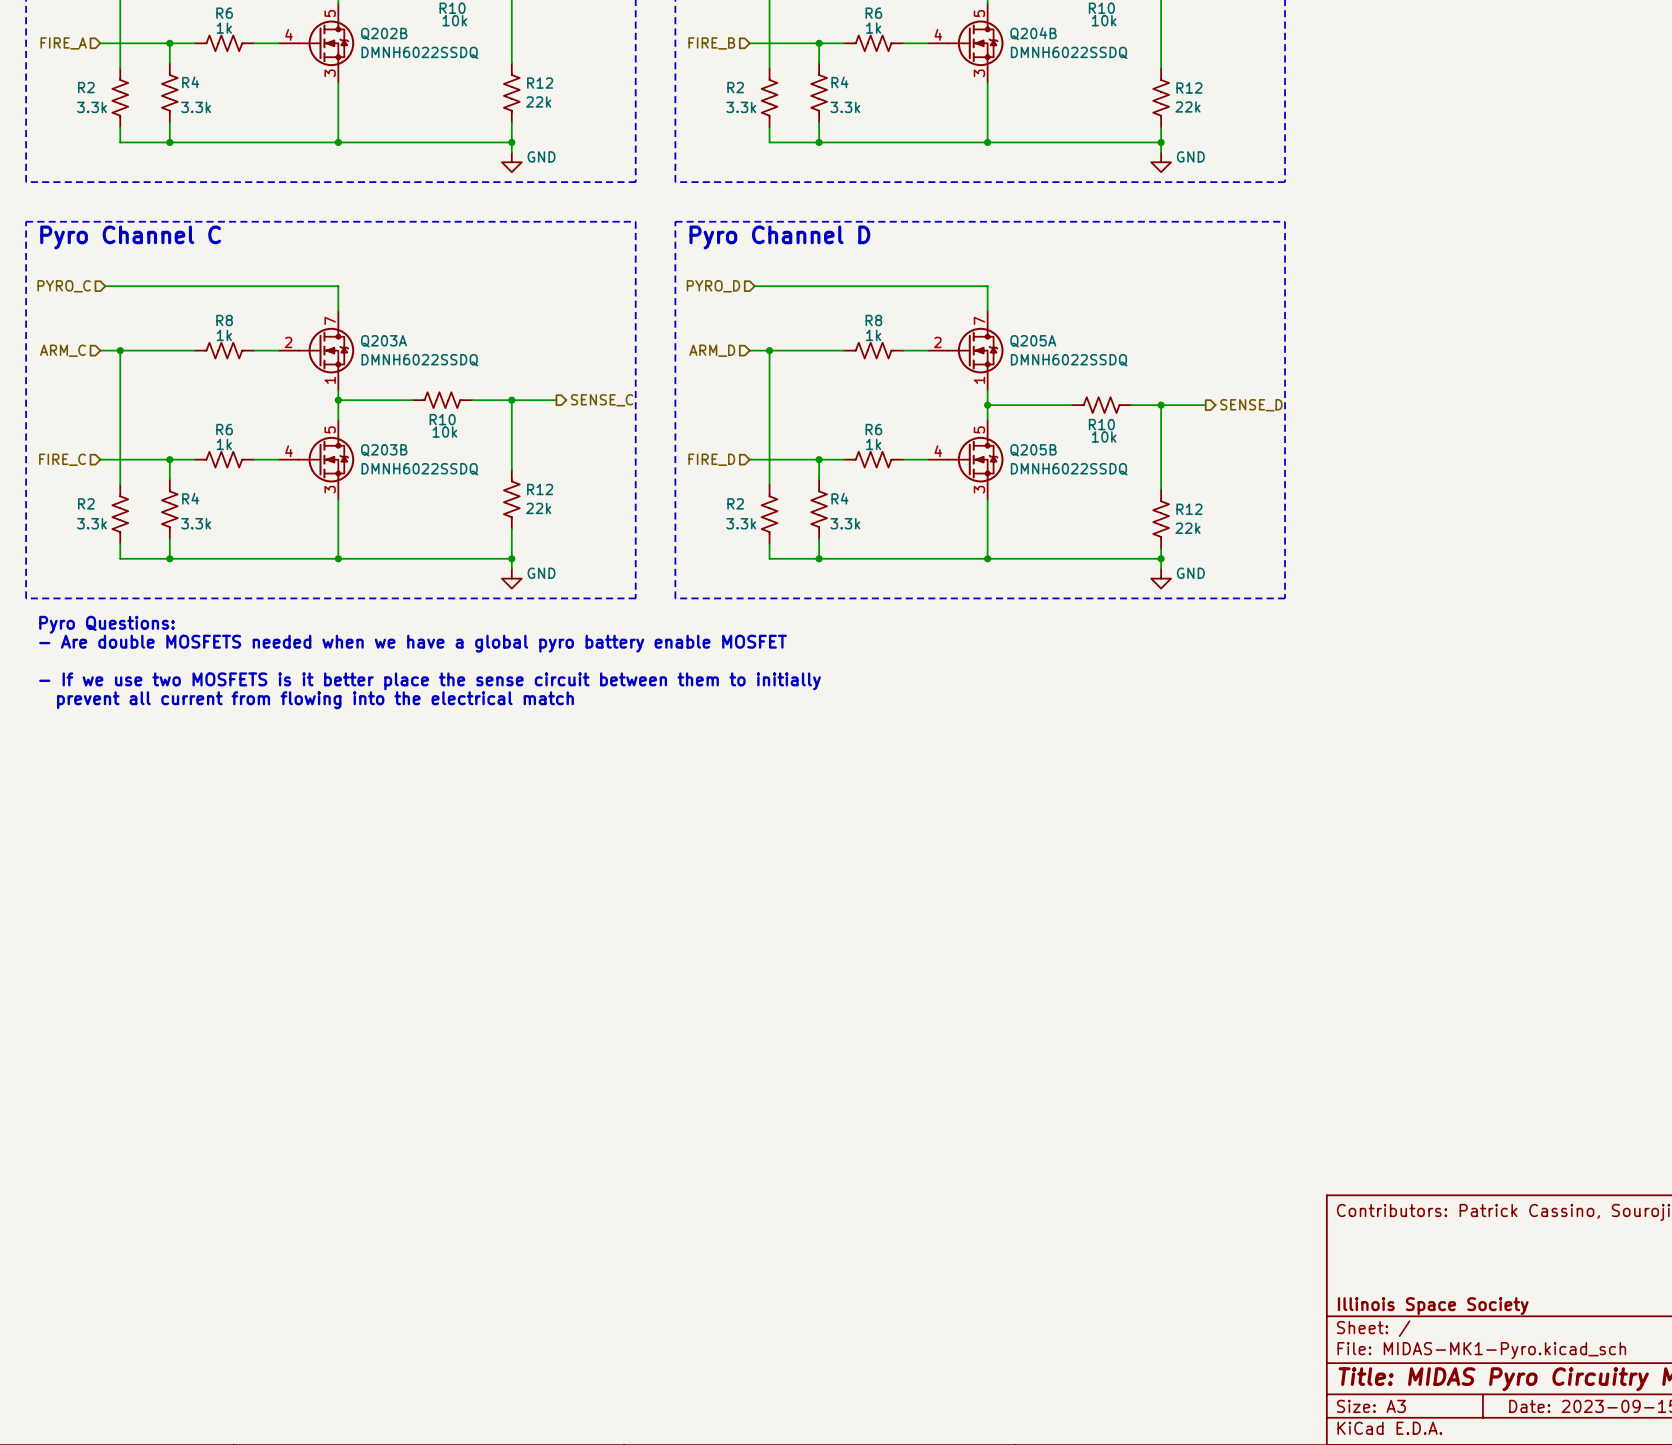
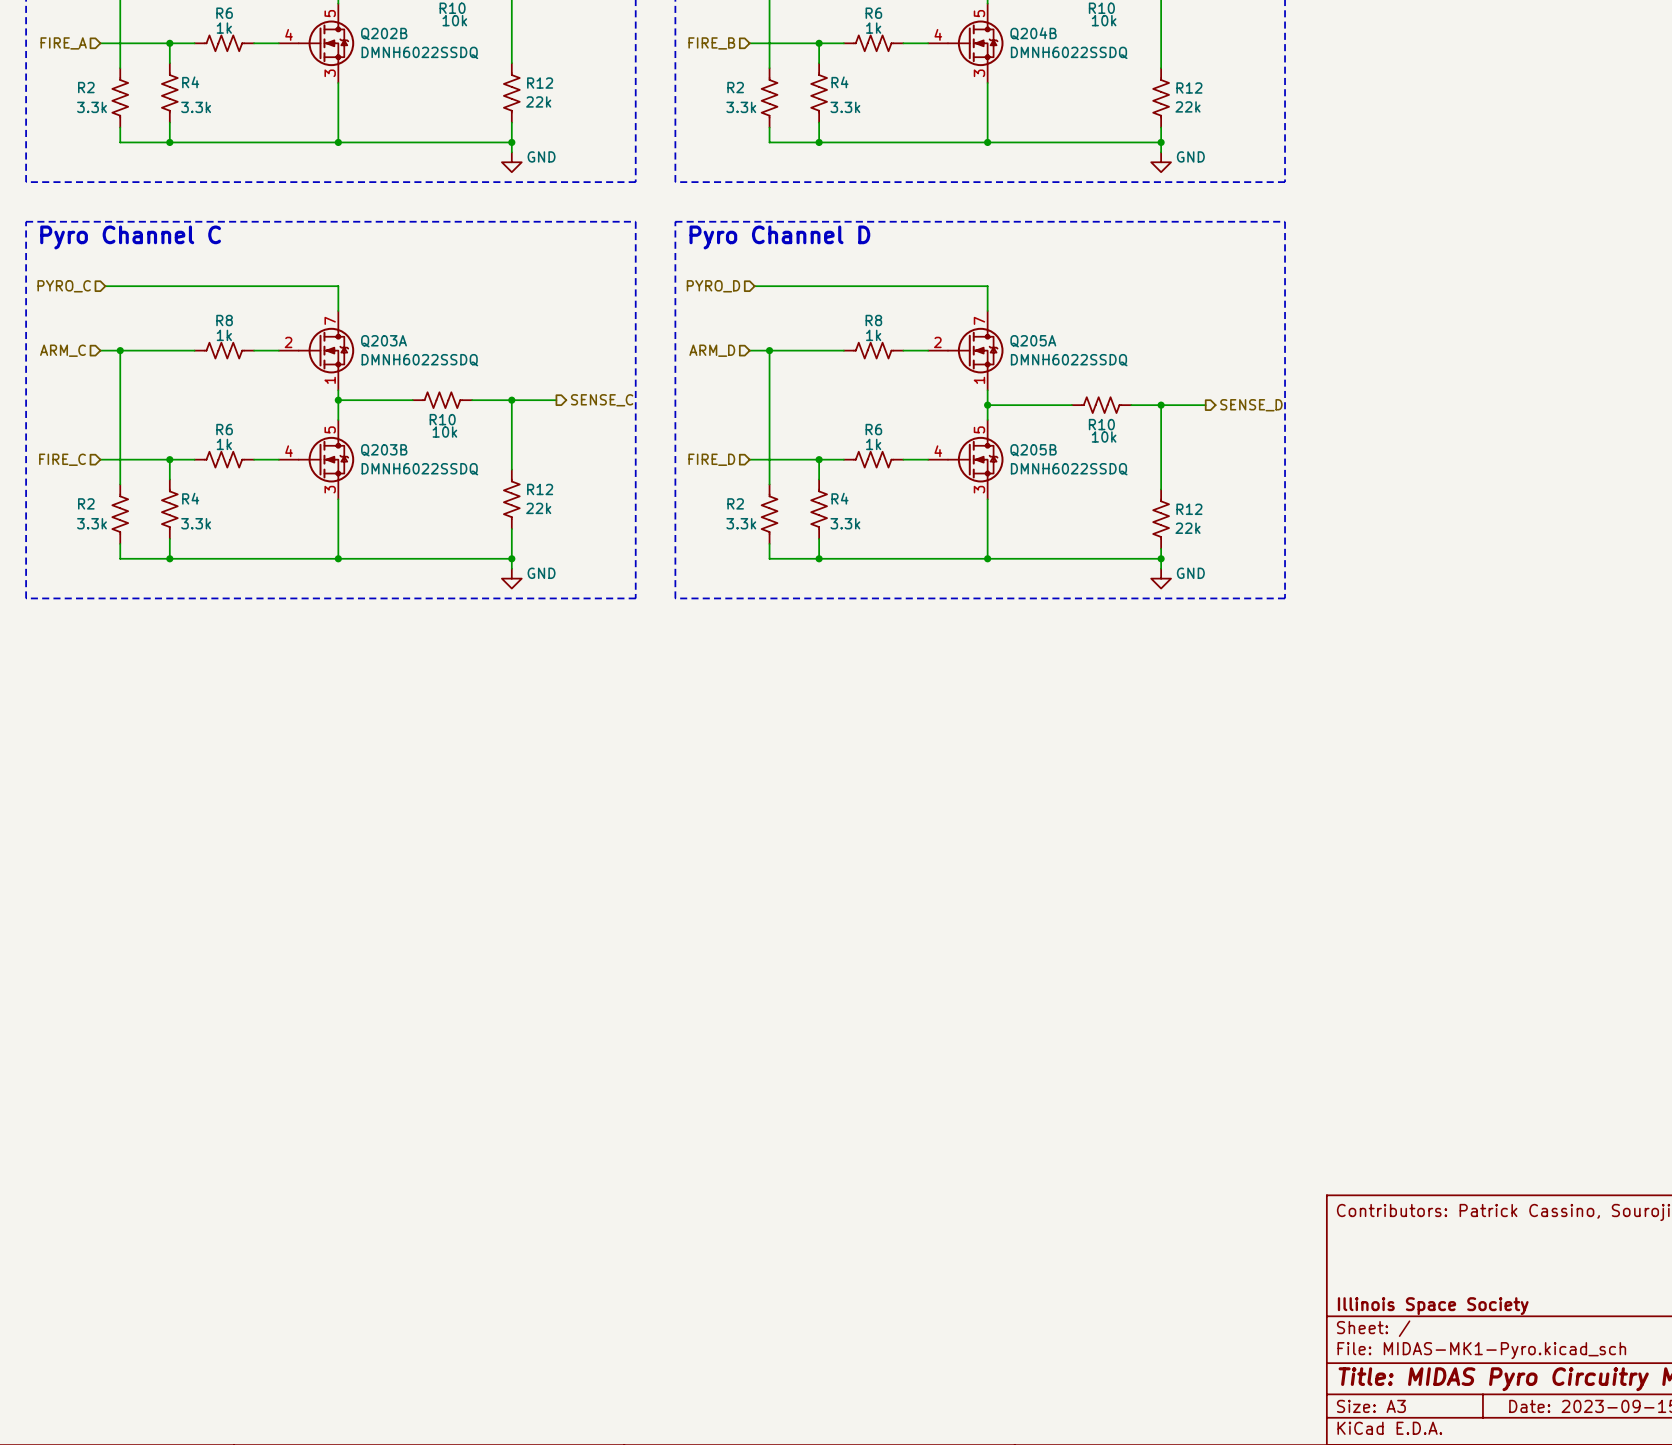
text: Pyro Questions: (106, 624) -> none
text: - Are double MOSFETS needed when we have a global pyro battery enable MOSFET (413, 643) -> none
text: - If we use two MOSFETS is it better place the sense circuit between them to initially (430, 681) -> none
text: prevent all current from flowing into the electrical match (315, 700) -> none

